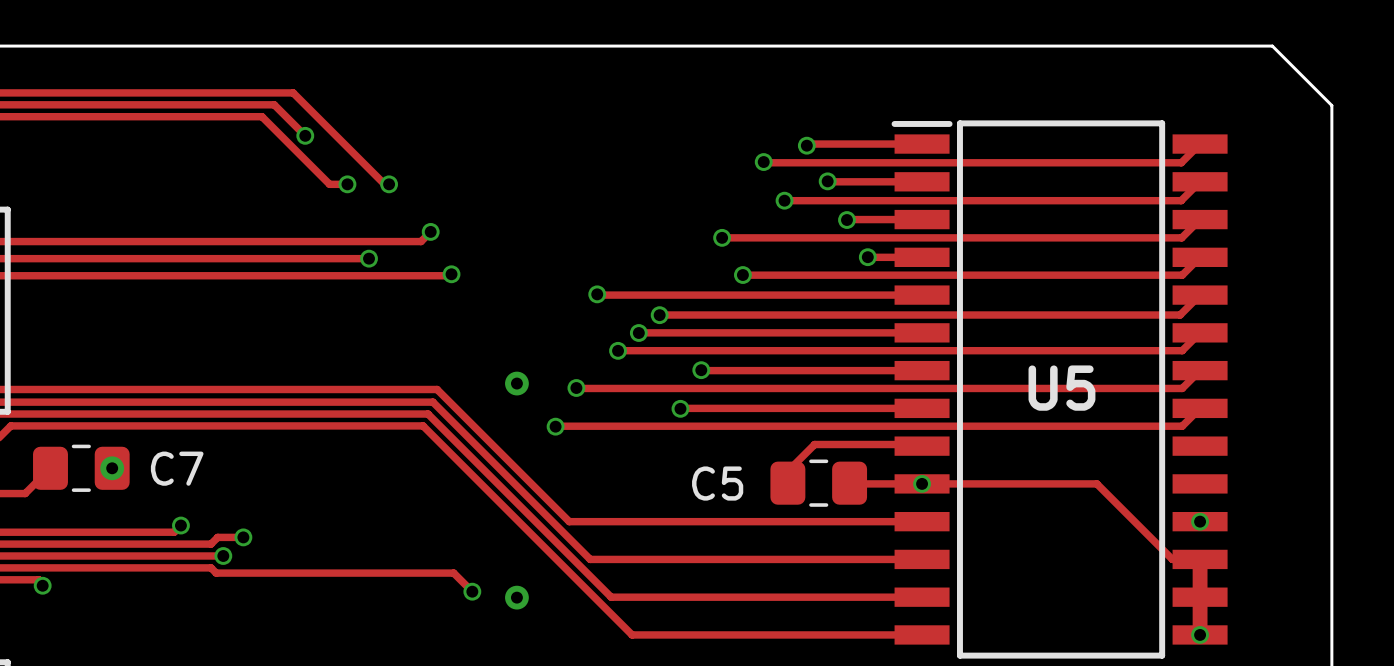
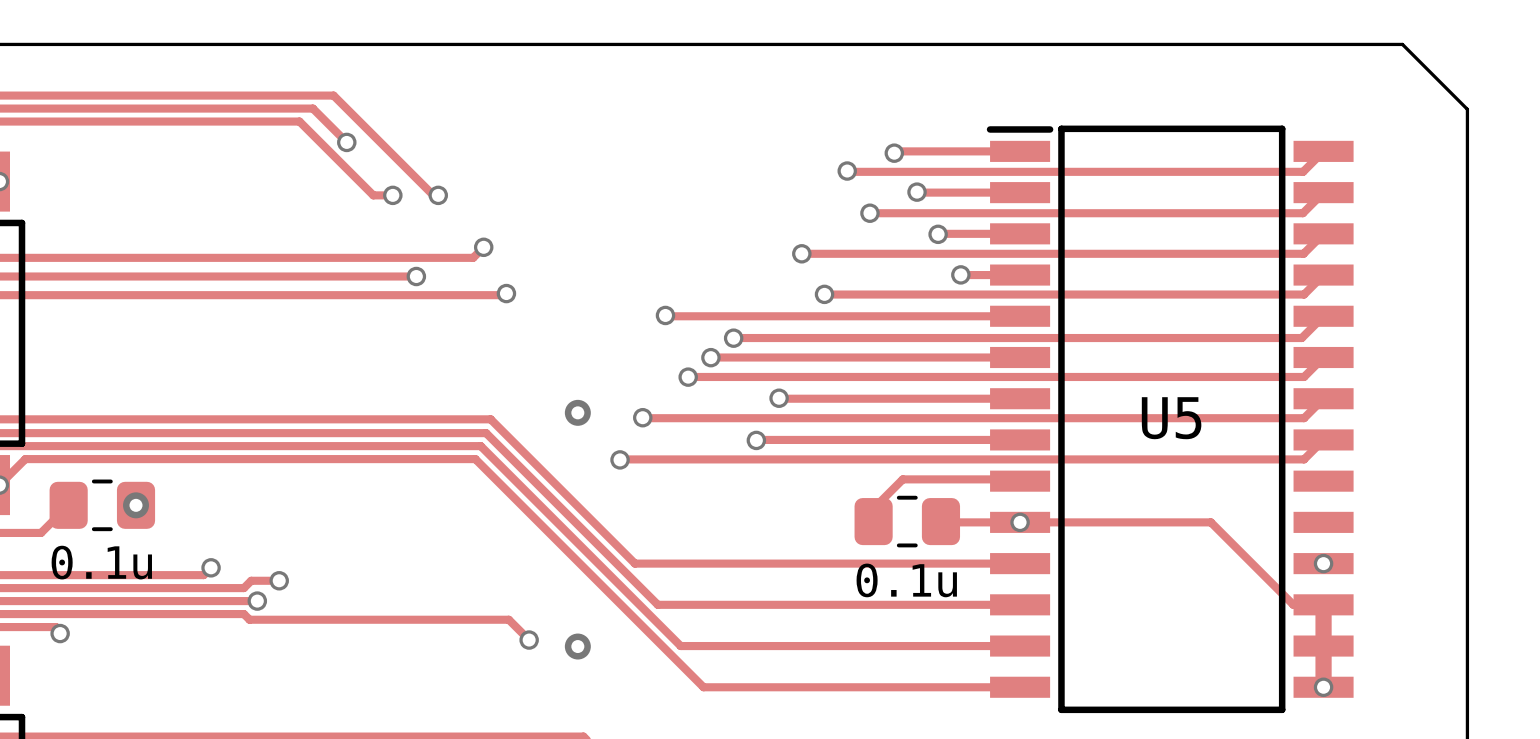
C7 name: C7 (177, 468) -> none
C5 name: C5 (717, 483) -> none
C7 value: none -> 0.1u (101, 562)
C5 value: none -> 0.1u (906, 580)

